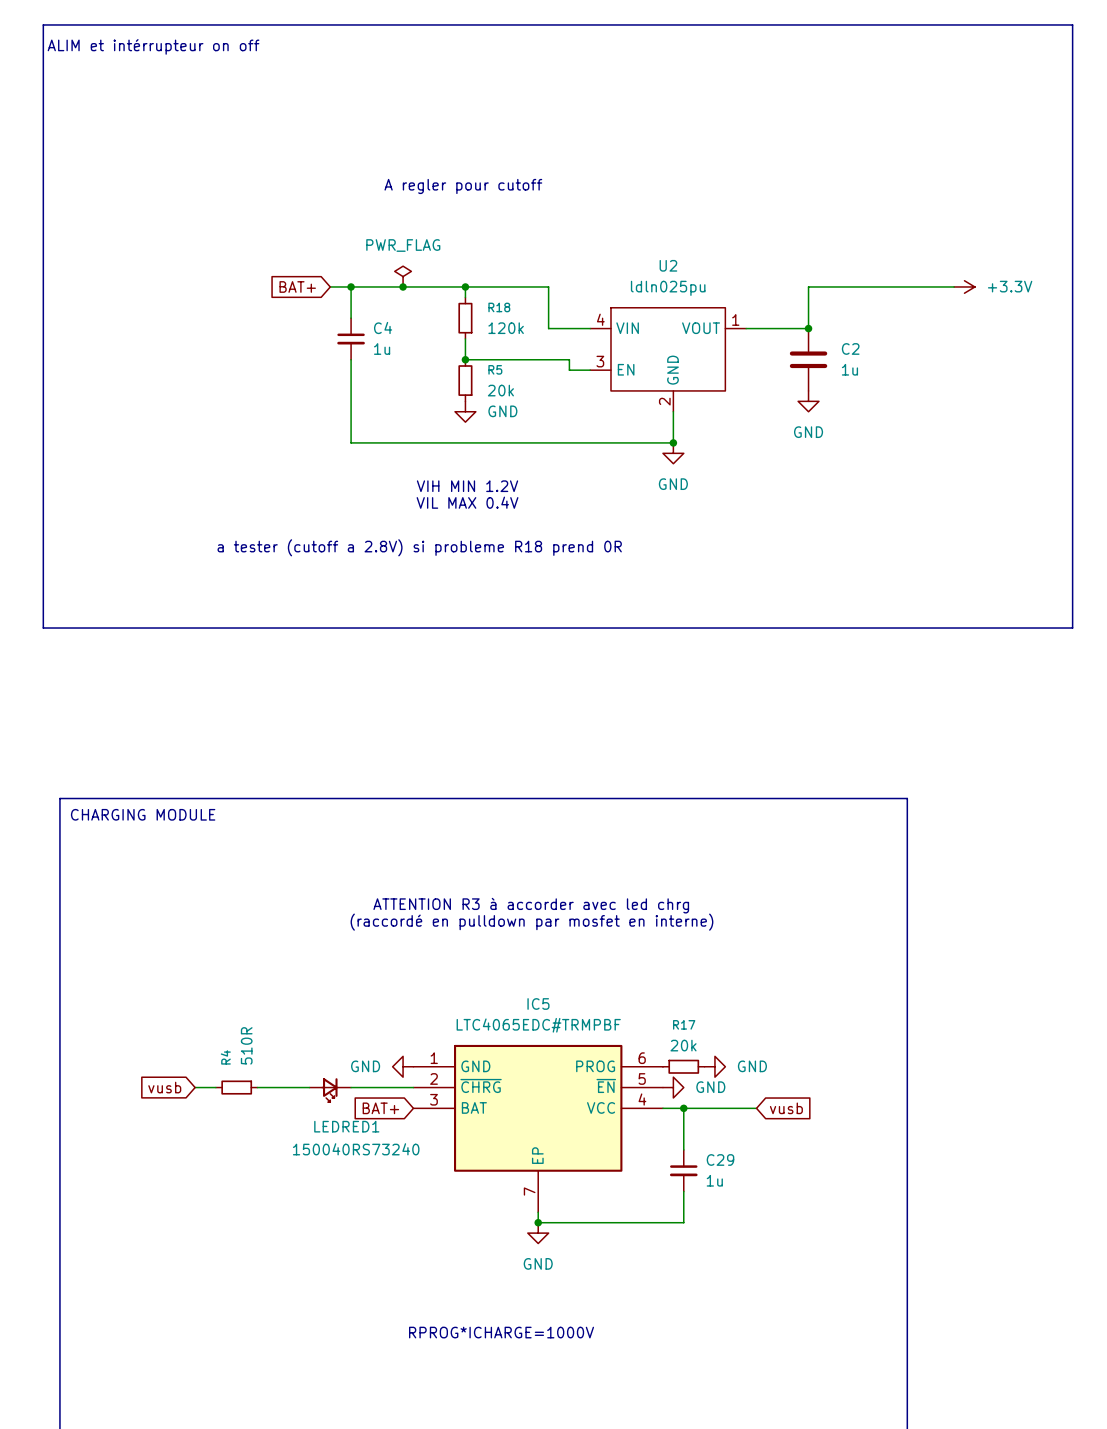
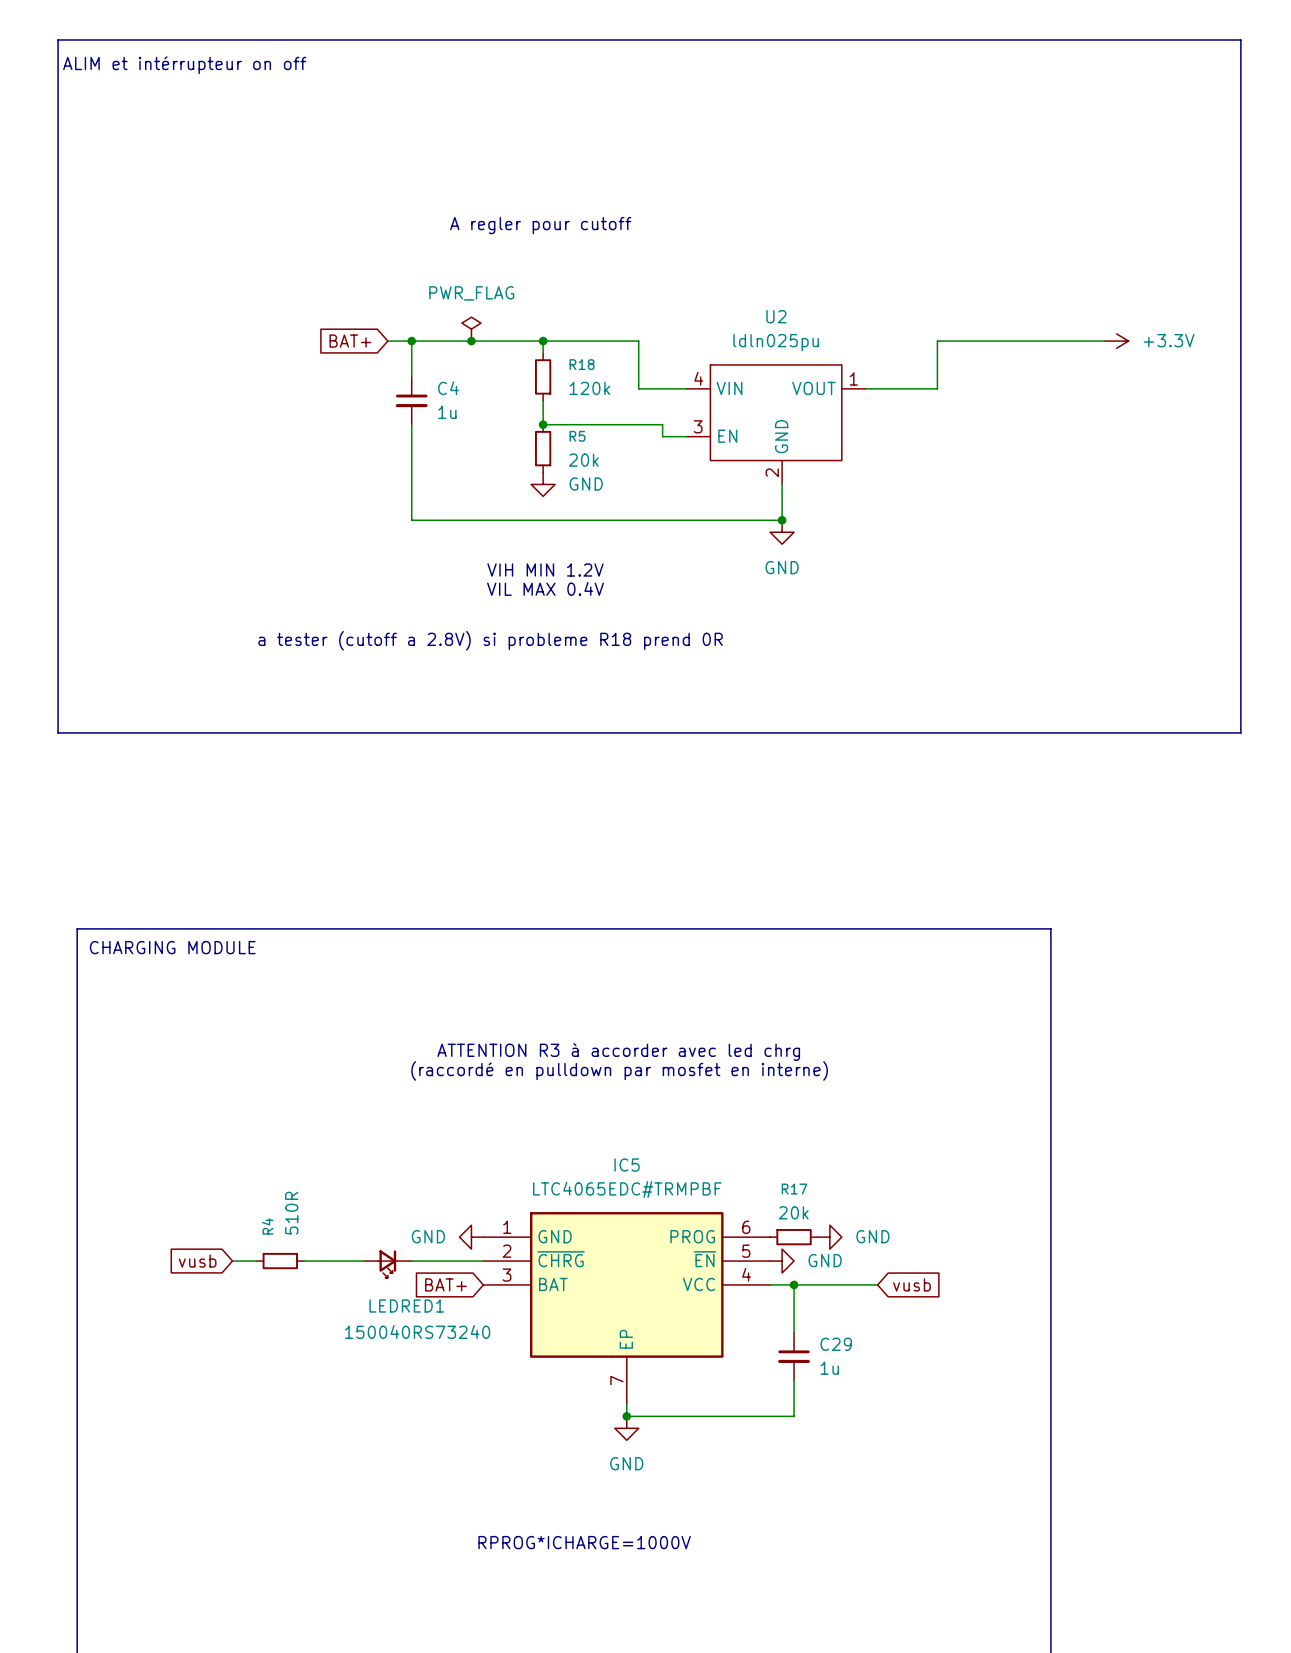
junction: (808, 328) -> none
C2: 1u (808, 359) -> none
power symbol: GND (808, 401) -> none

